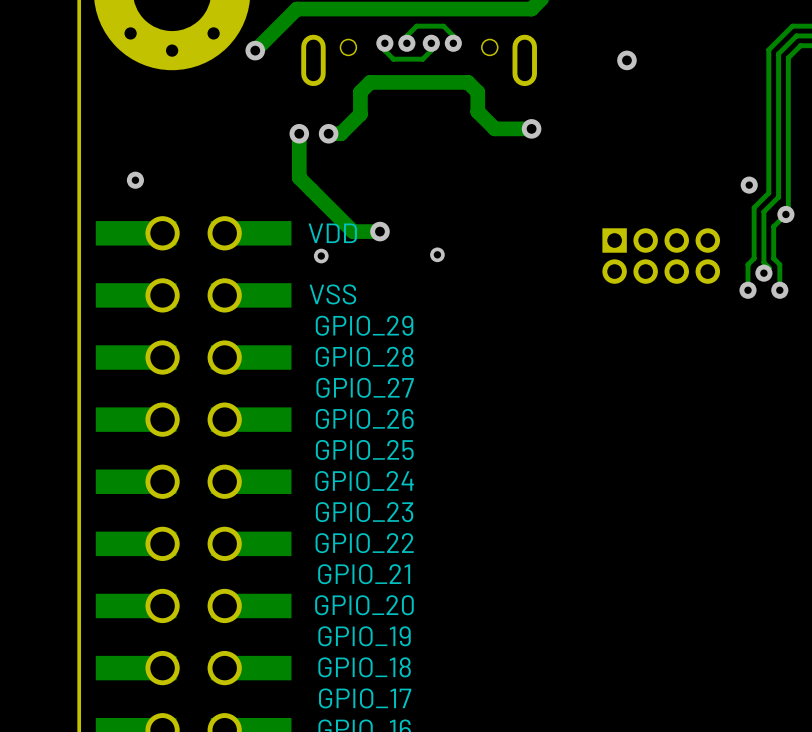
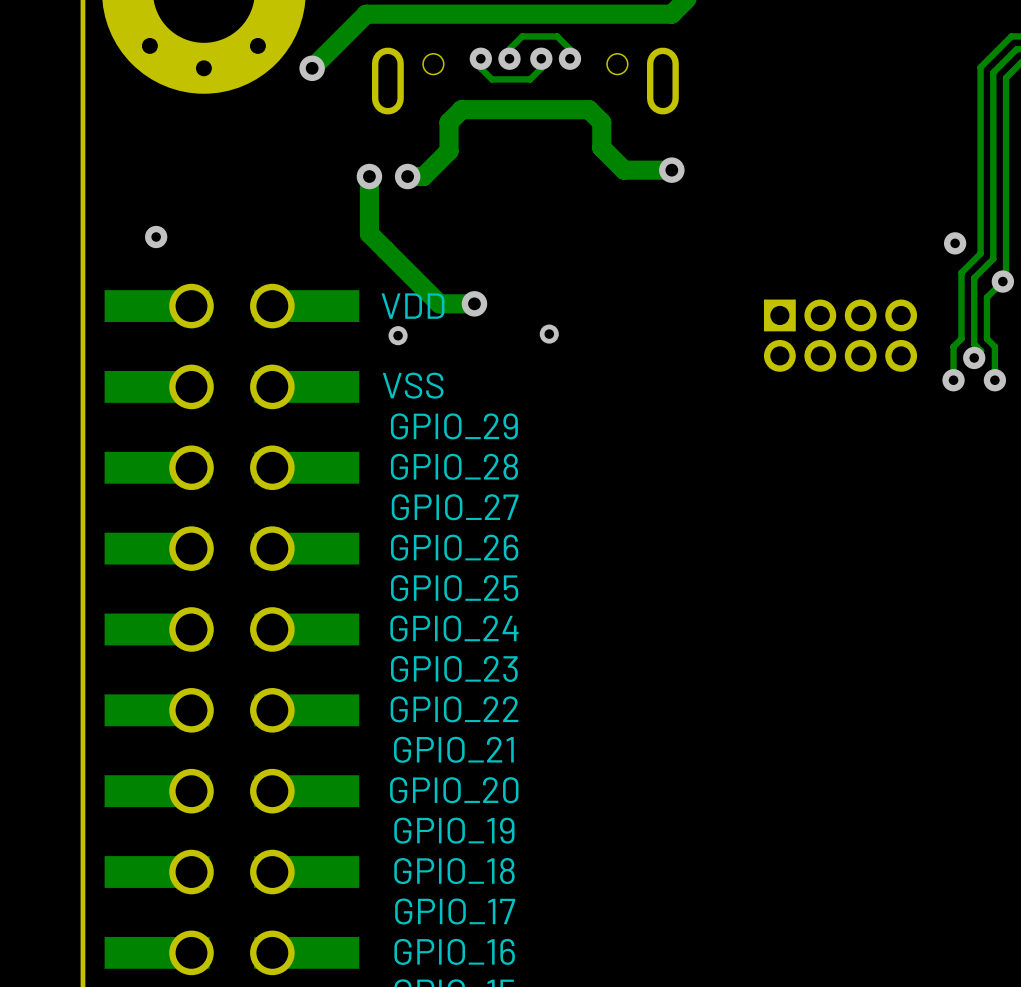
via: (626, 60) -> none

